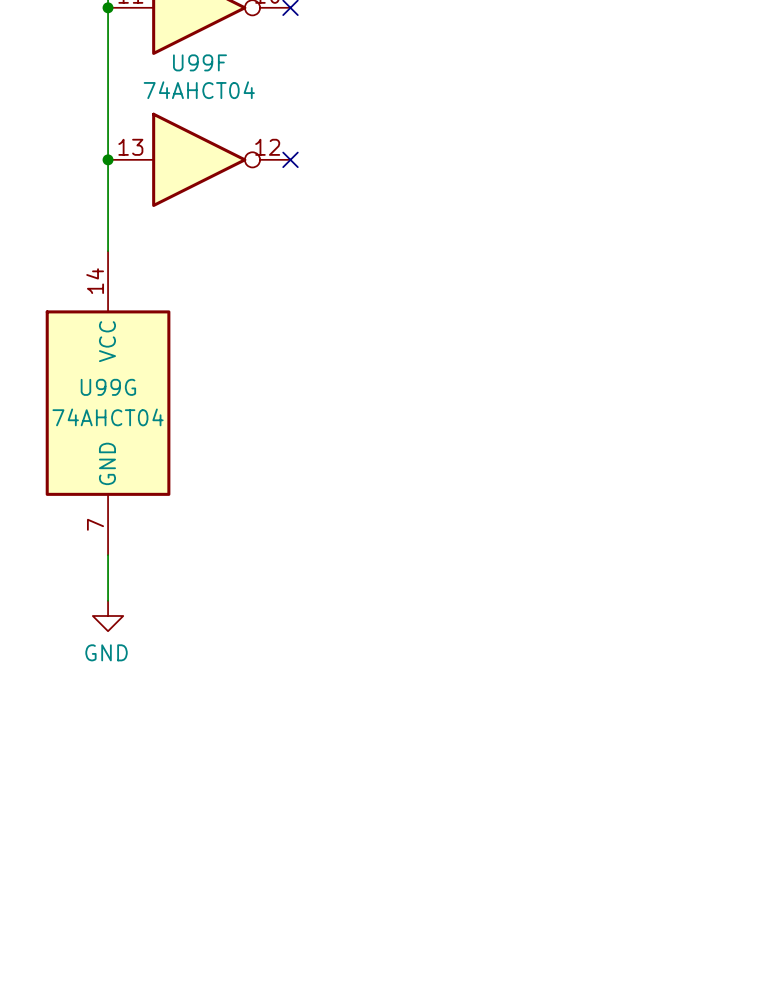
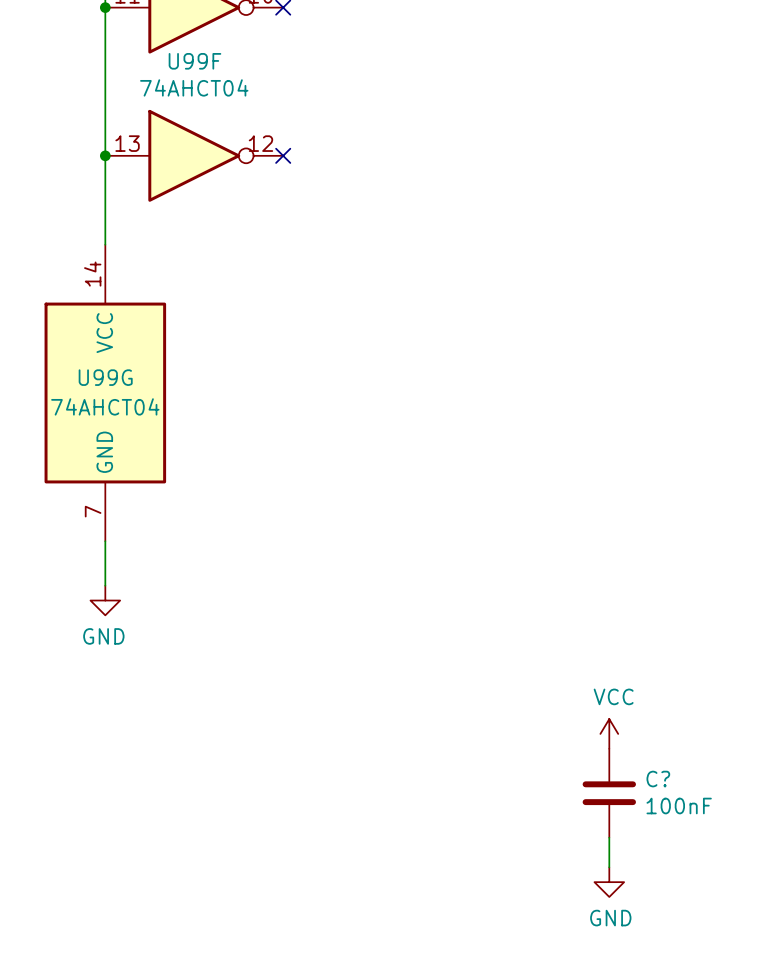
power symbol: none -> VCC (609, 733)
C?: none -> 100nF (609, 793)
wire: none -> (609, 837) (609, 867)
power symbol: none -> GND (609, 882)

